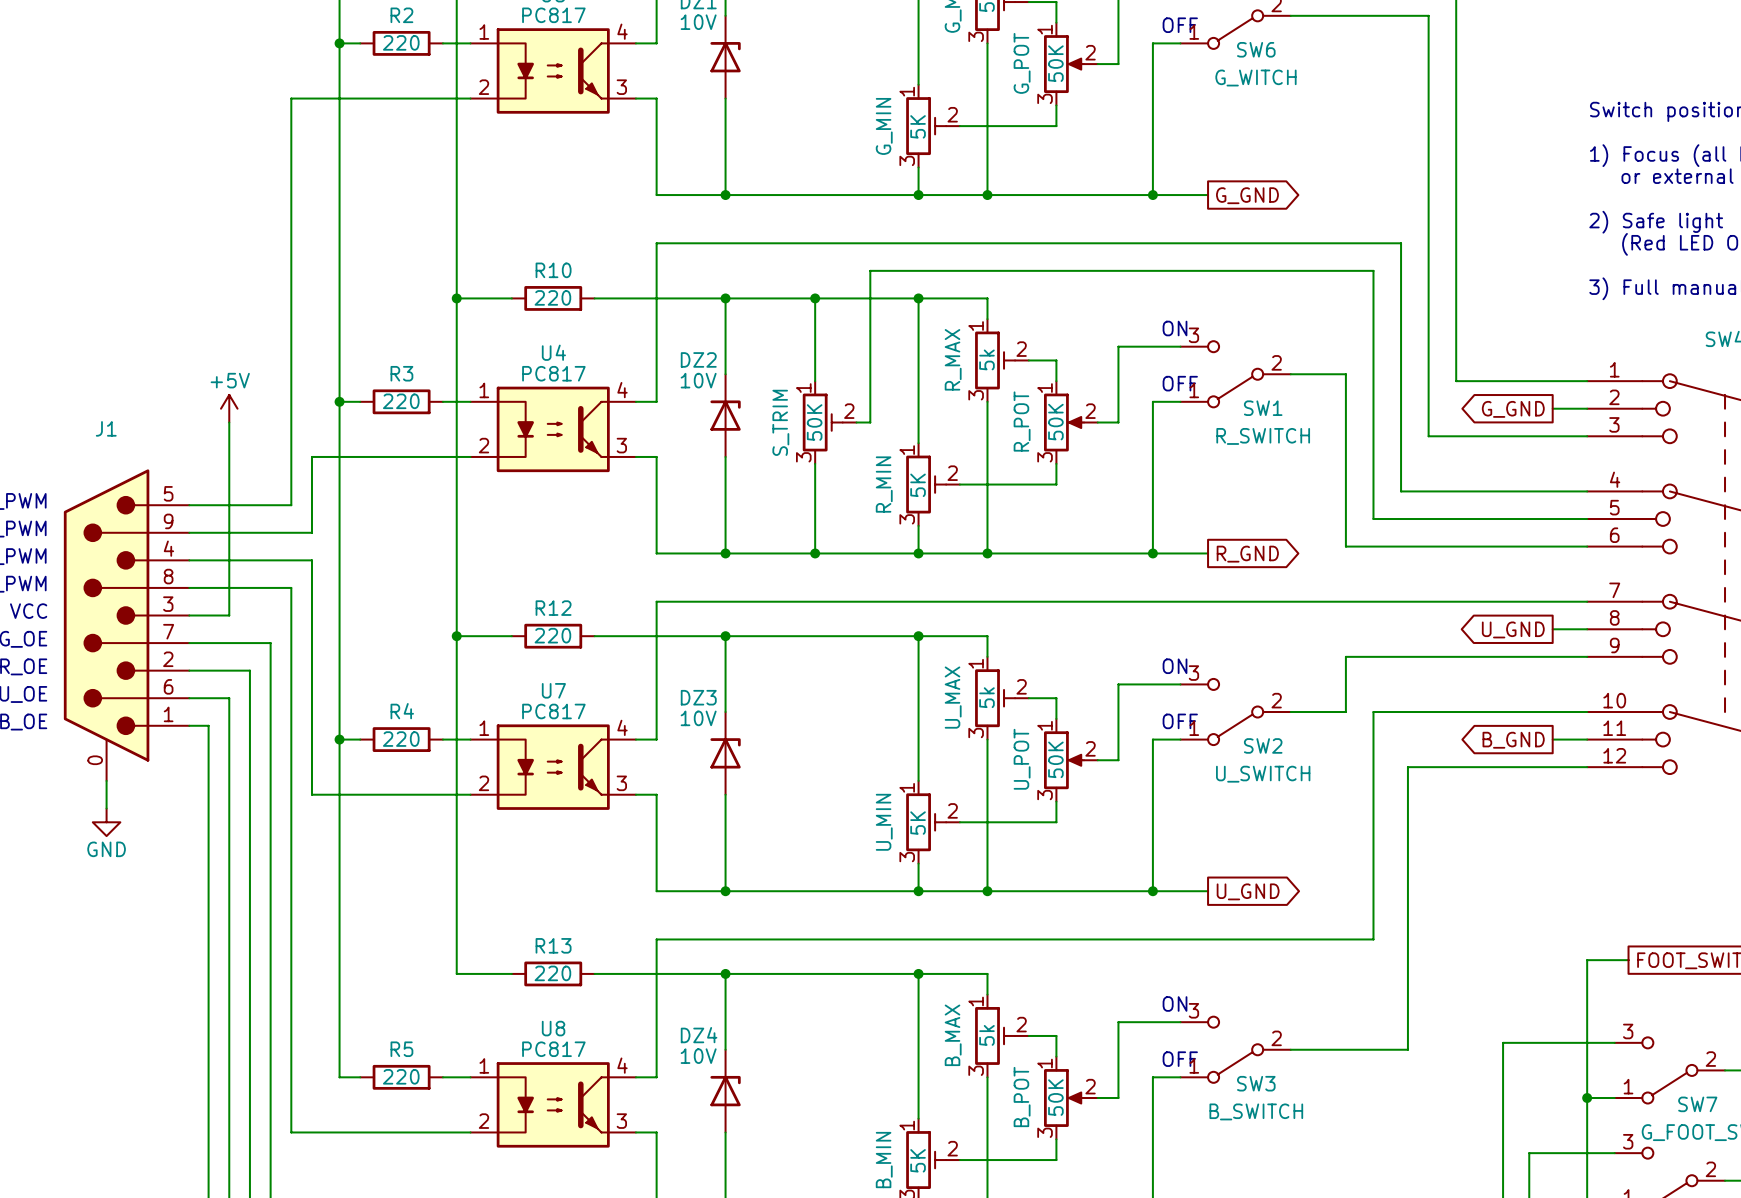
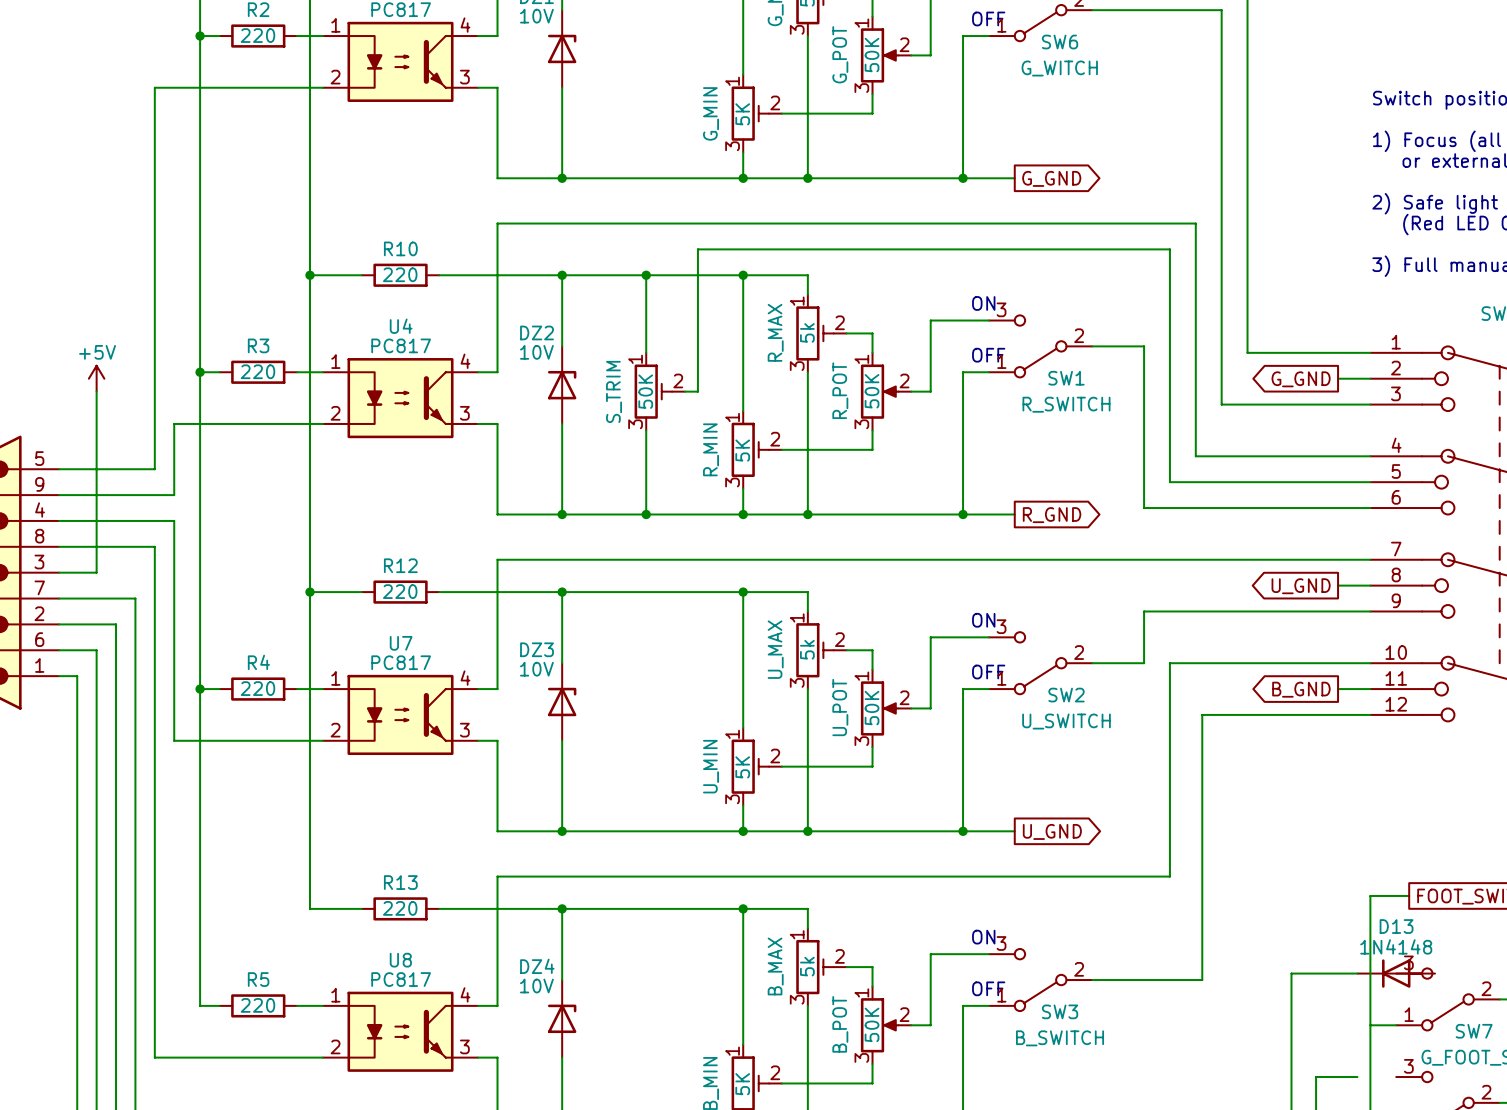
D13: none -> 1N4148 (1396, 973)
junction: (1587, 1098) -> none
wire: (1573, 1153) (1614, 1153) -> none

